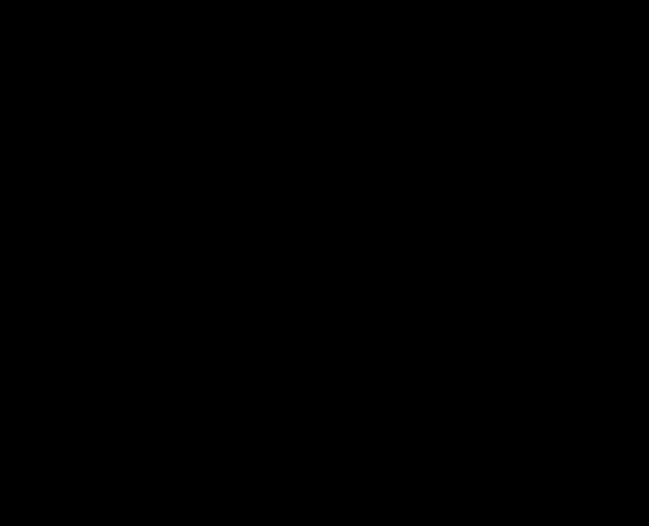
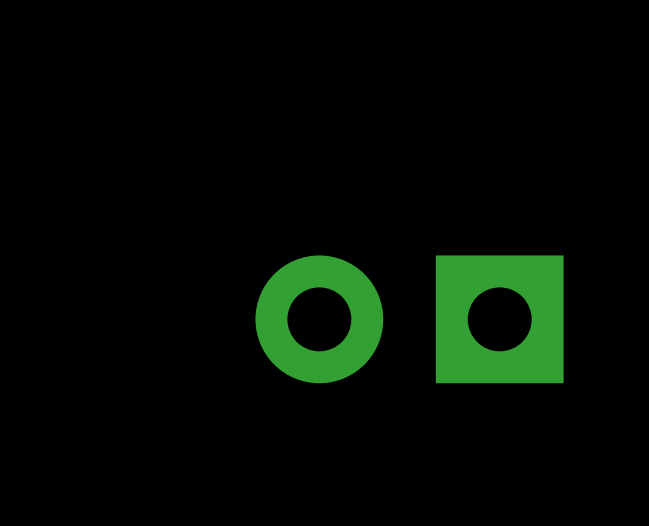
part: none -> (409, 319)

